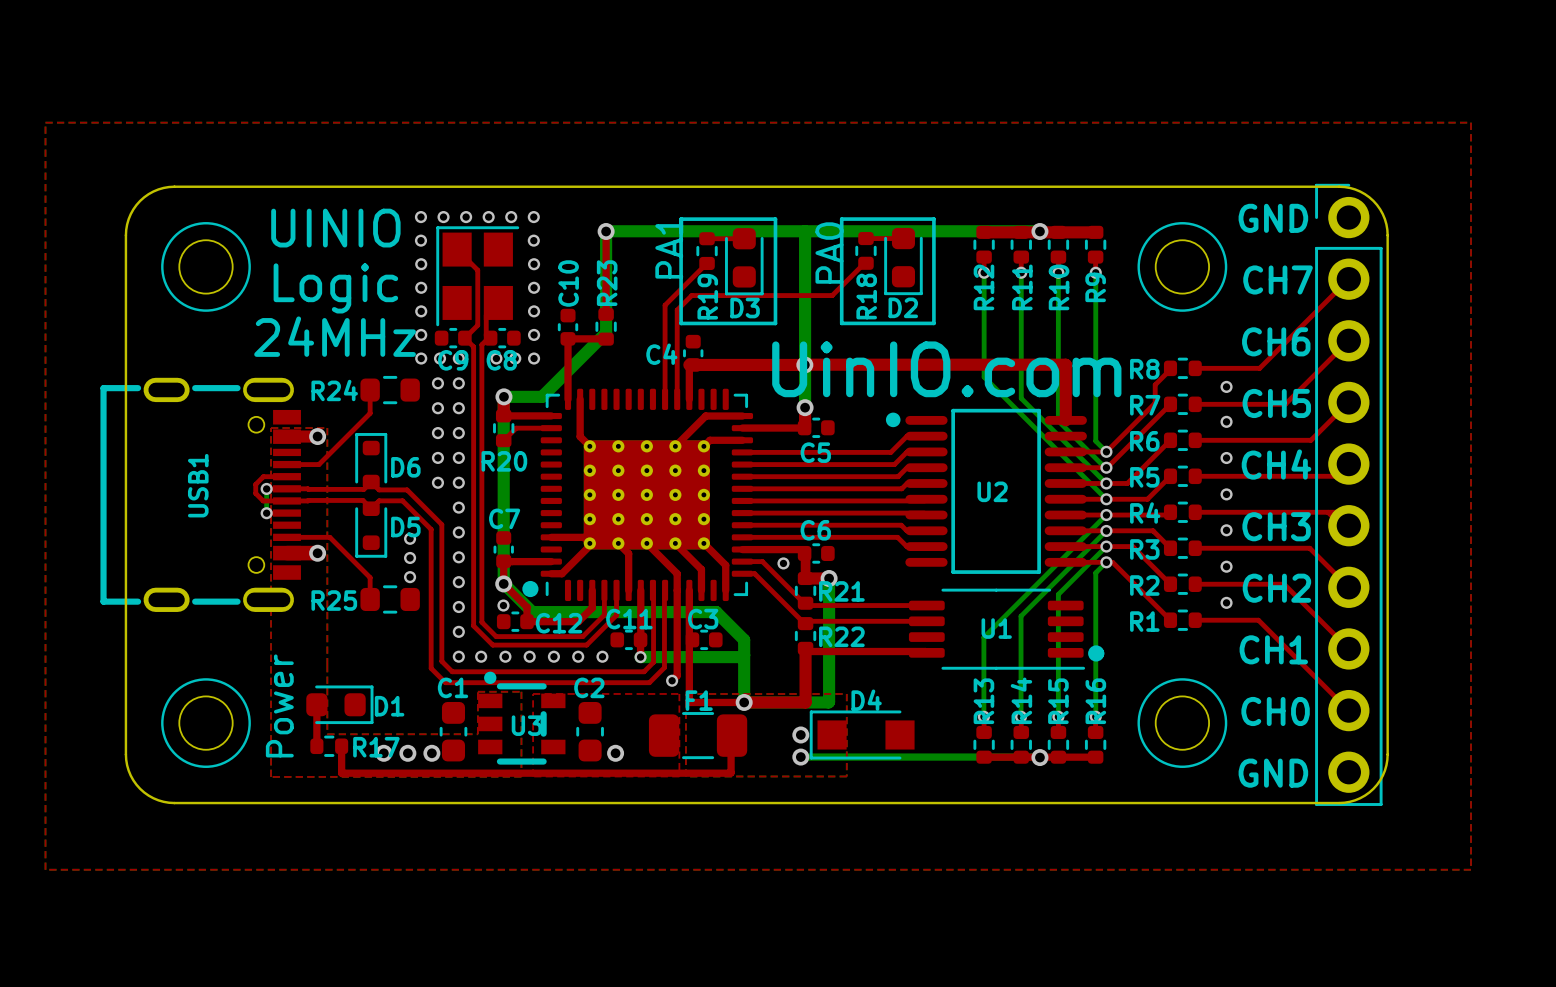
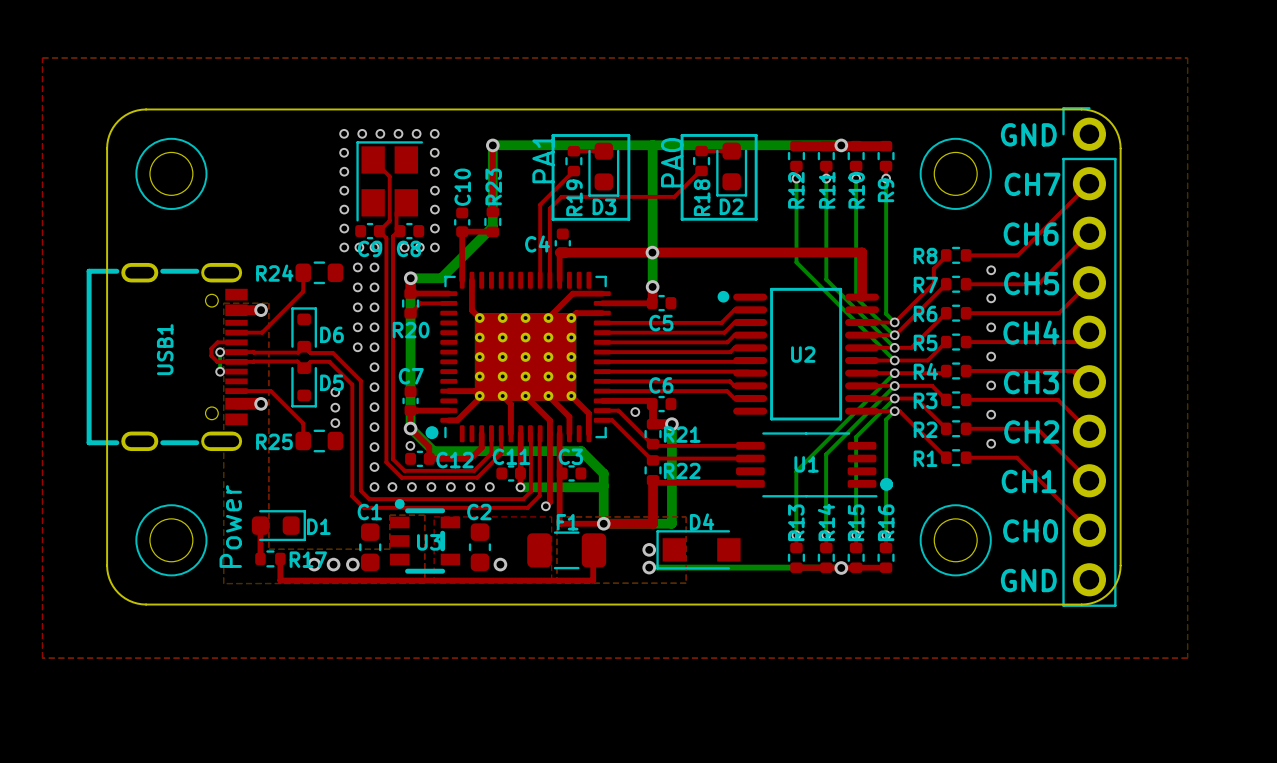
text: UINIO (335, 228) -> none
text: Logic (335, 288) -> none
text: 24MHz (335, 336) -> none
text: UinIO.com (946, 369) -> none

